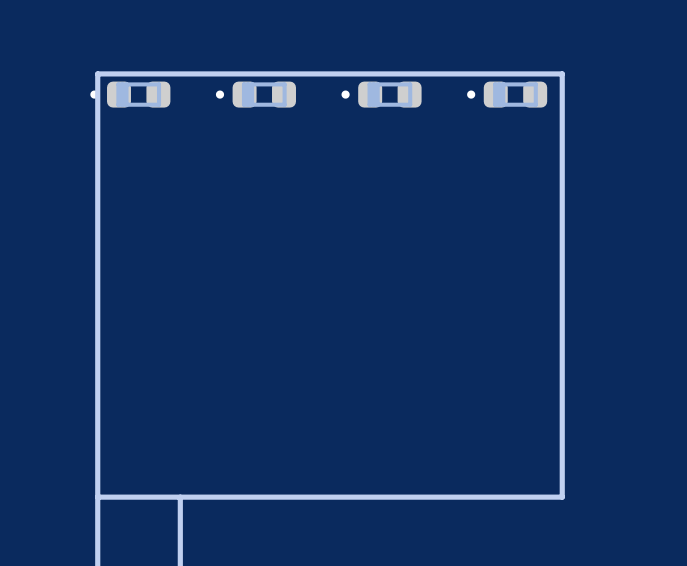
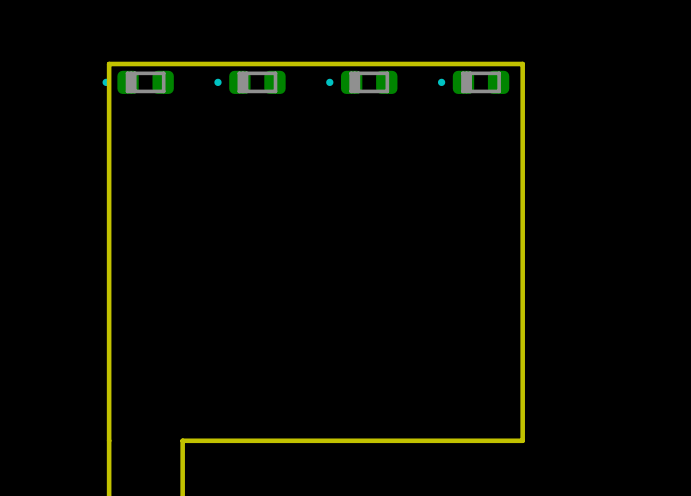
board edge: (180, 497) (97, 497) -> none

